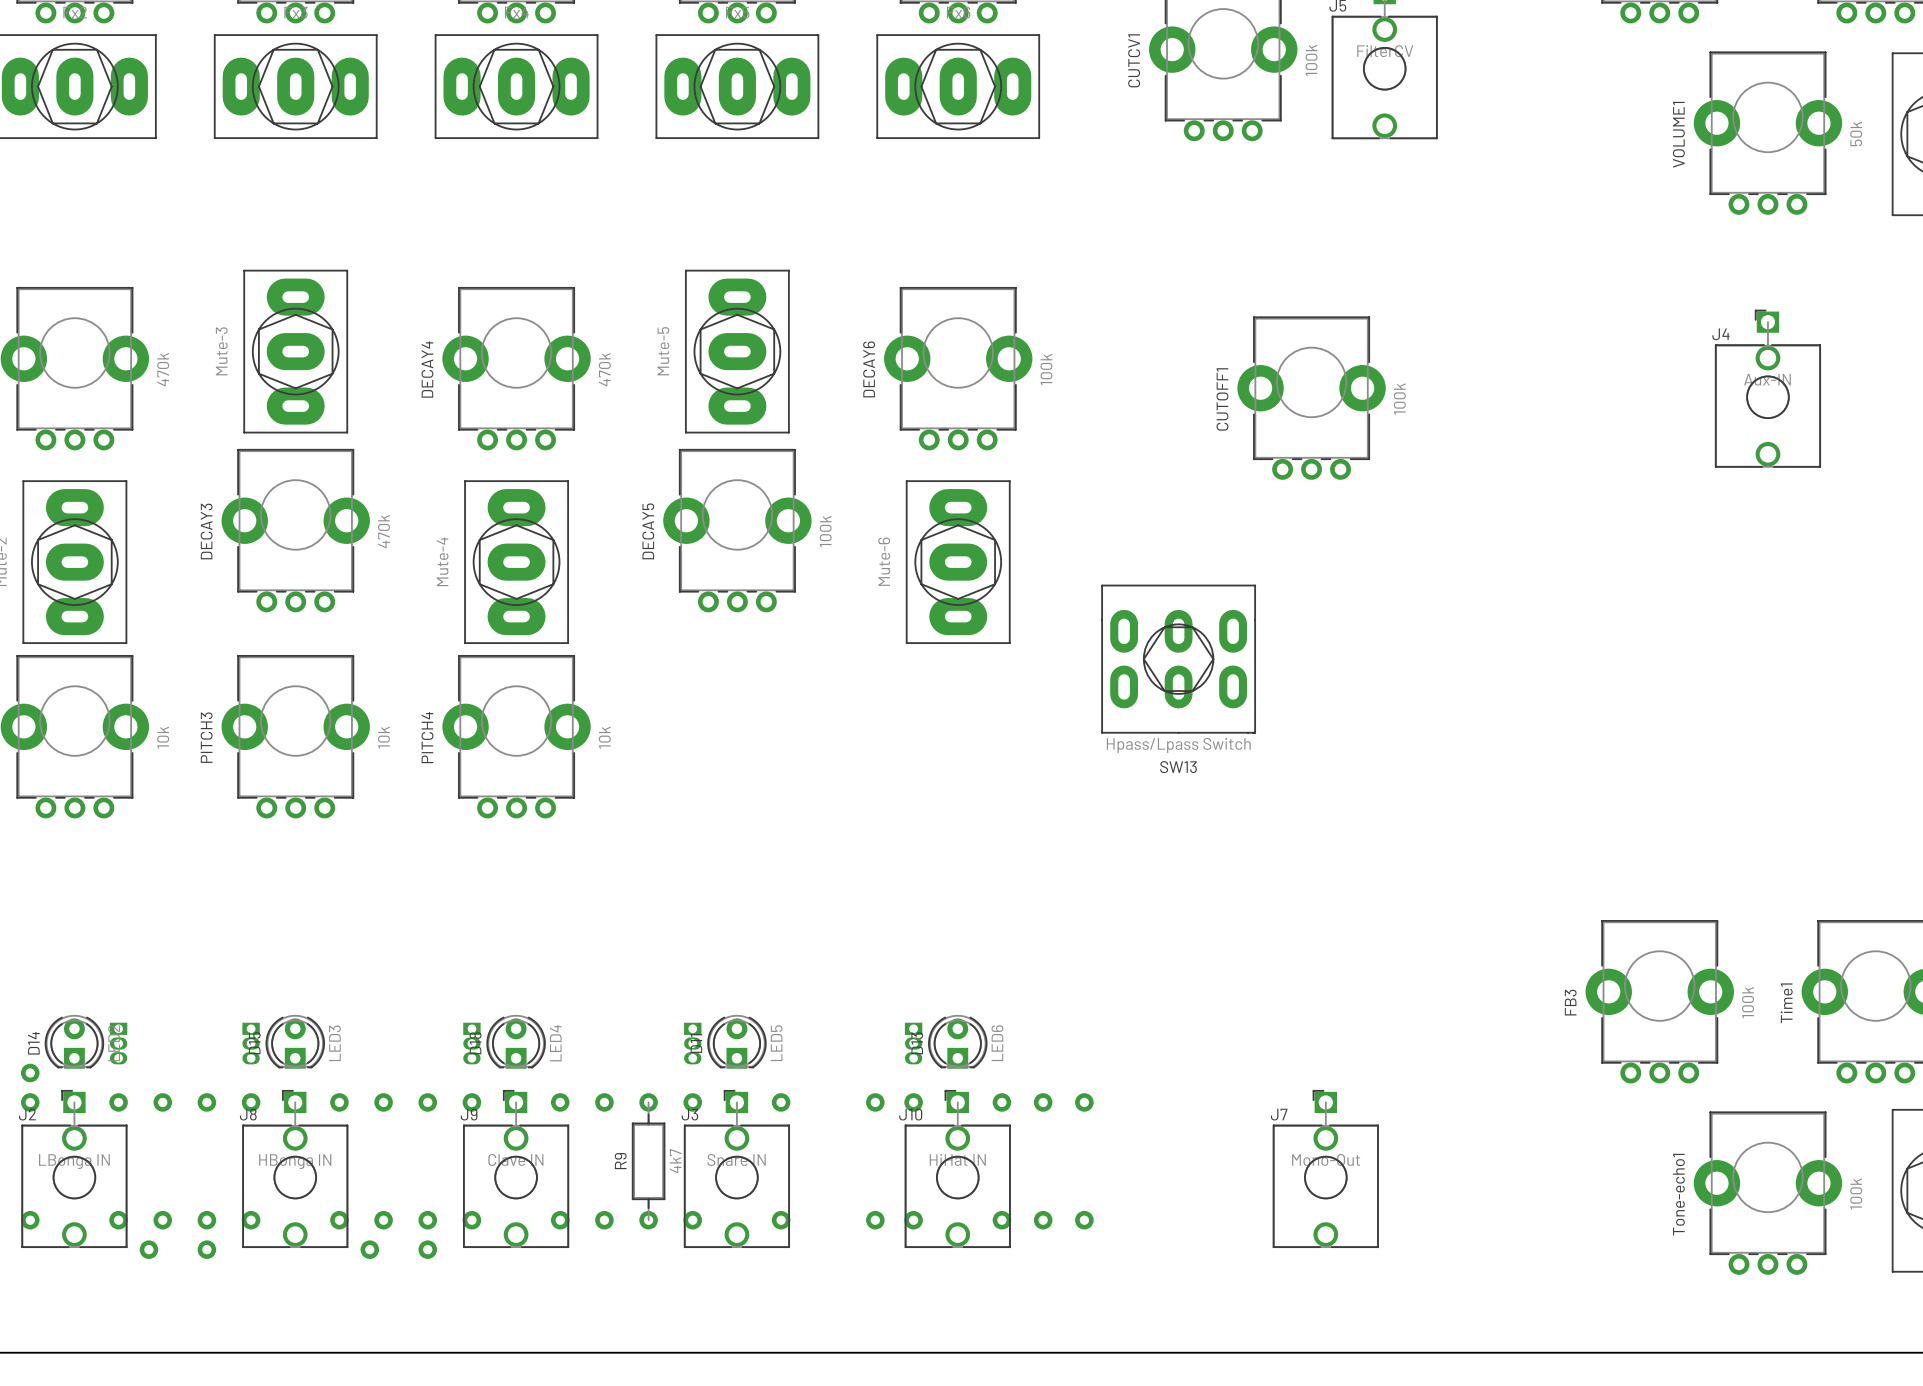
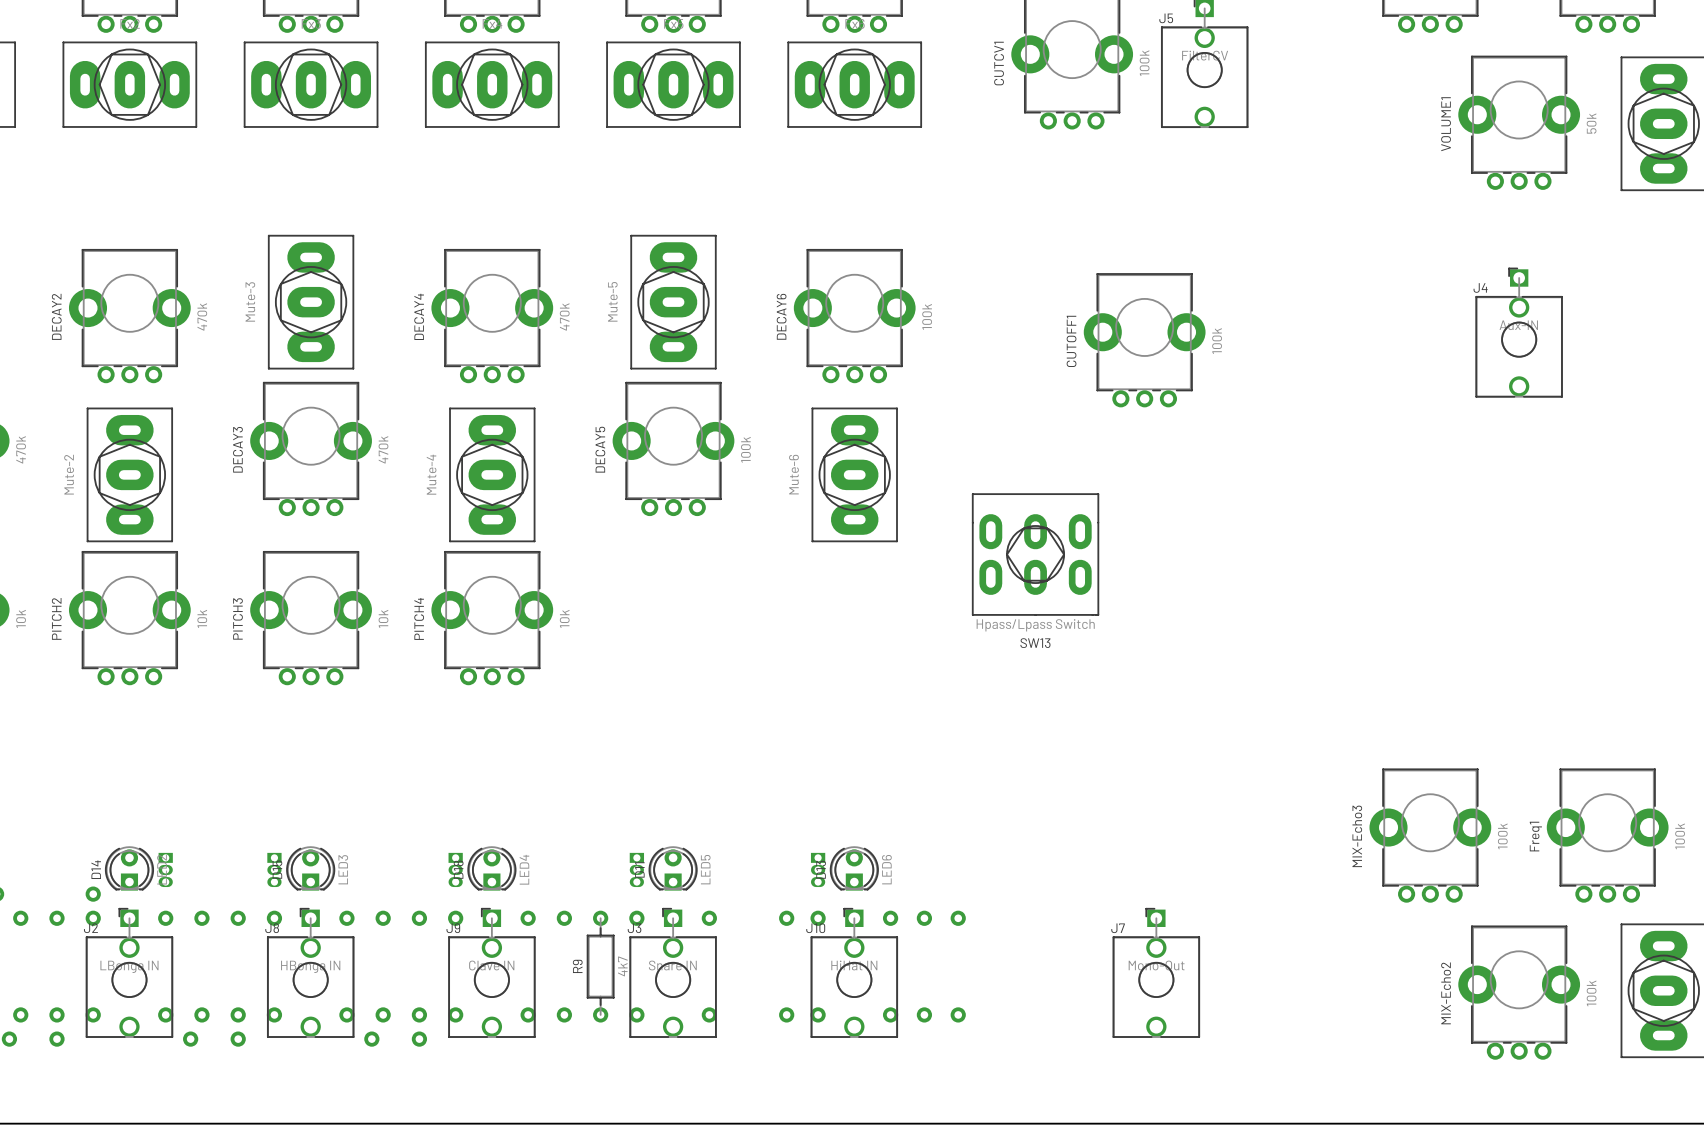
FB3 name: FB3 (1570, 1002) -> MIX-Echo3 (1357, 836)
Time1 name: Time1 (1786, 1003) -> Freq1 (1535, 836)
Tone-echo1 name: Tone-echo1 (1678, 1194) -> MIX-Echo2 (1446, 993)

